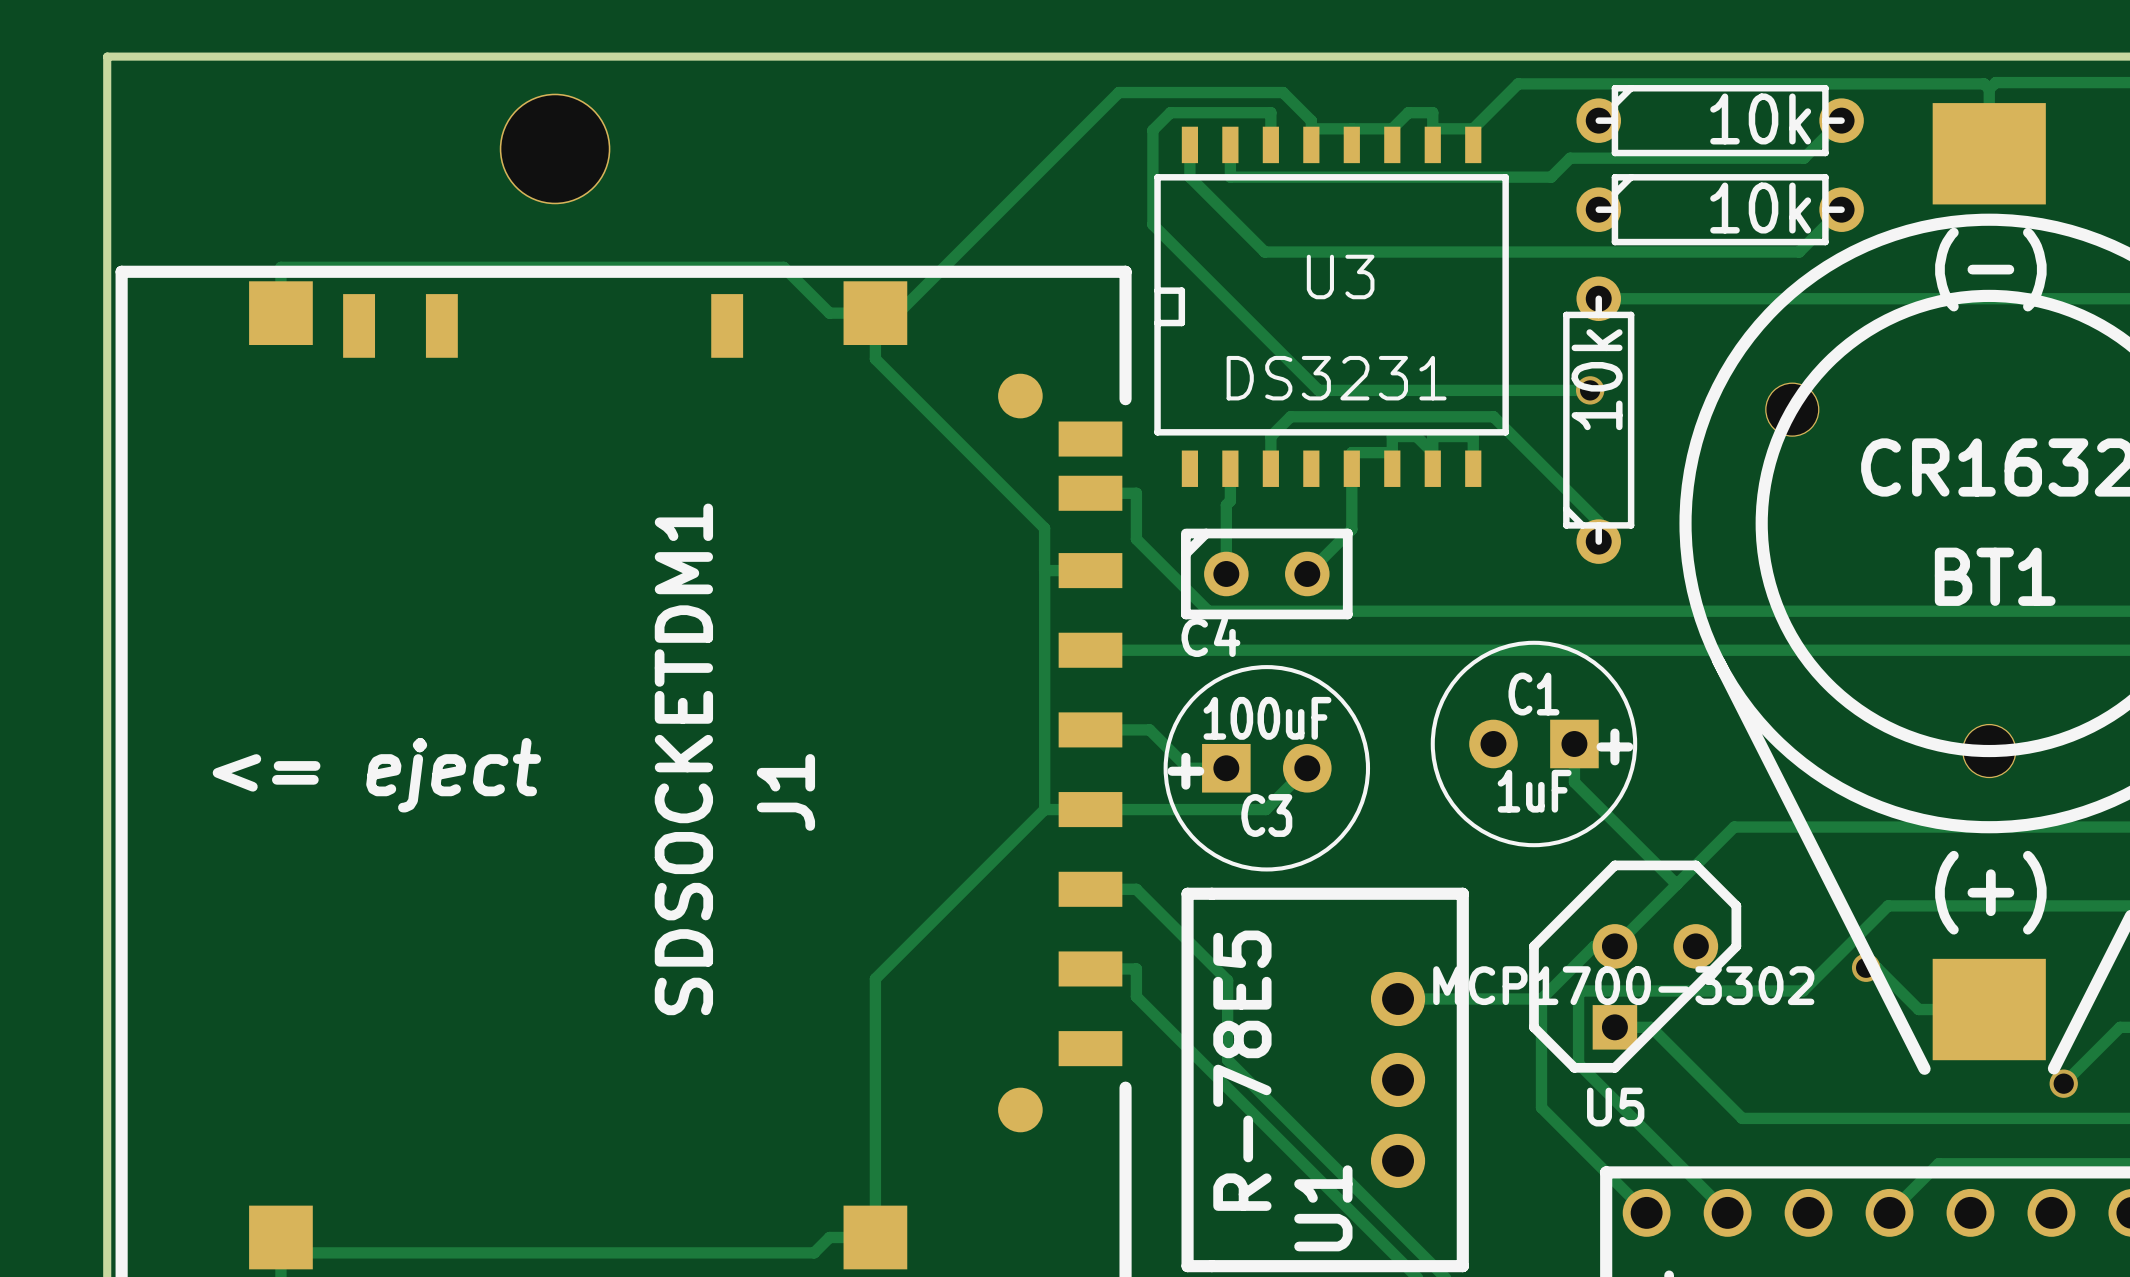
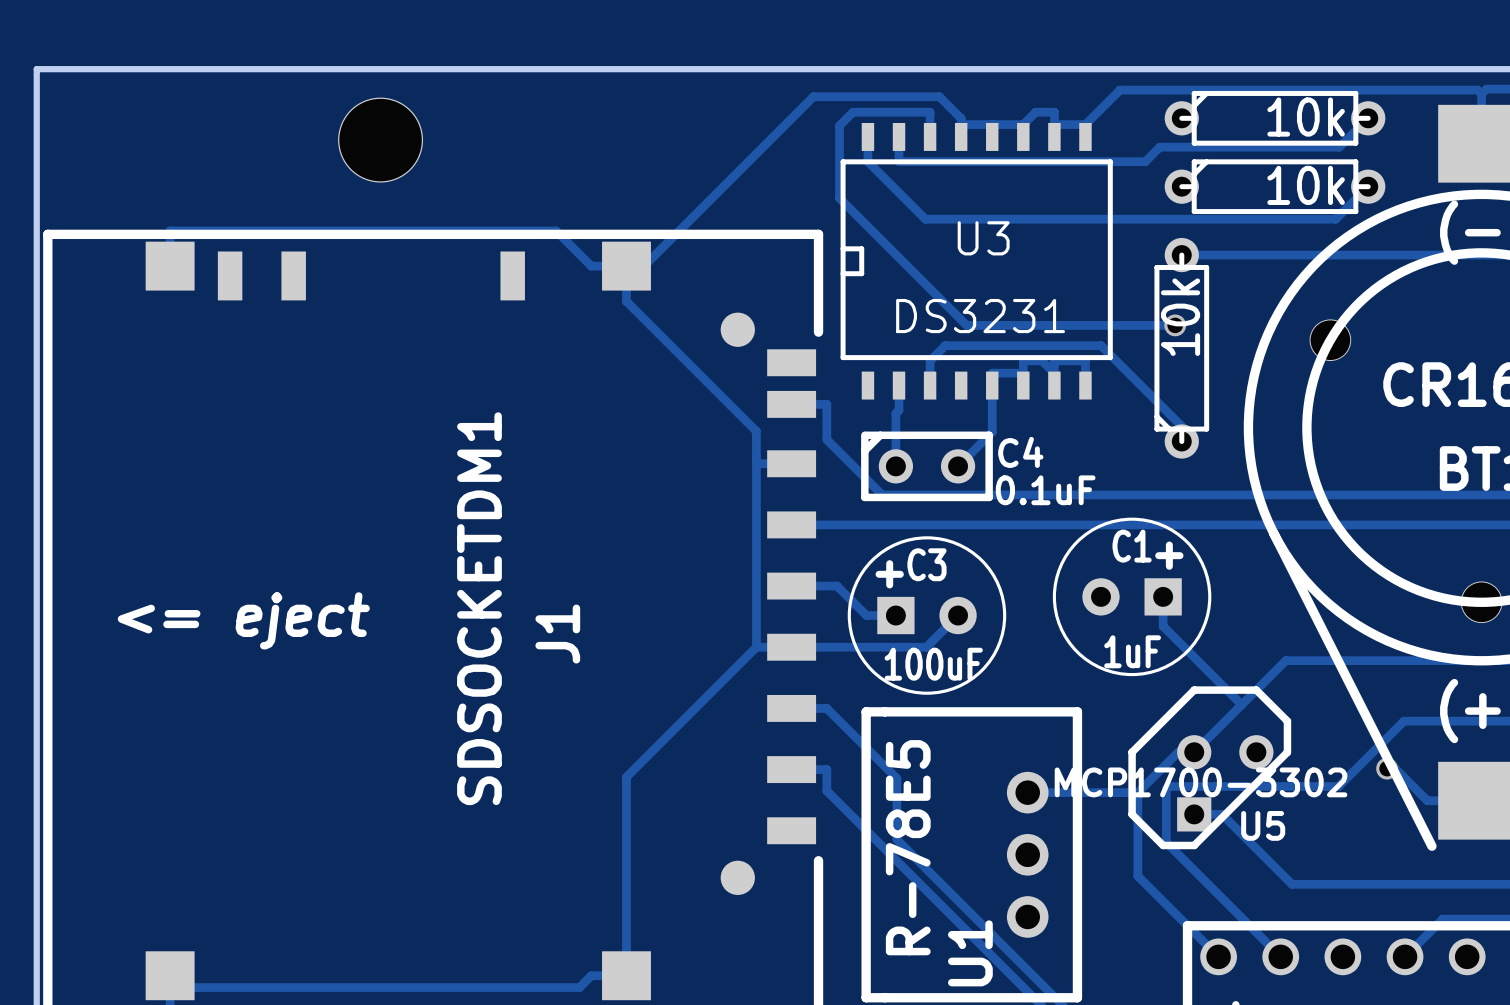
C4 value: none -> 0.1uF (1045, 490)
C4 name position: C4 (1210, 636) -> C4 (1020, 452)
C1 name position: C1 (1533, 694) -> C1 (1132, 546)
C3 value position: 100uF (1267, 718) -> 100uF (933, 664)
C1 text position: + (1614, 746) -> + (1169, 555)
C3 text position: + (1185, 771) -> + (889, 574)
C1 value position: 1uF (1534, 791) -> 1uF (1132, 651)
C3 name position: C3 (1266, 815) -> C3 (926, 564)
U5 name position: U5 (1615, 1107) -> U5 (1263, 825)

